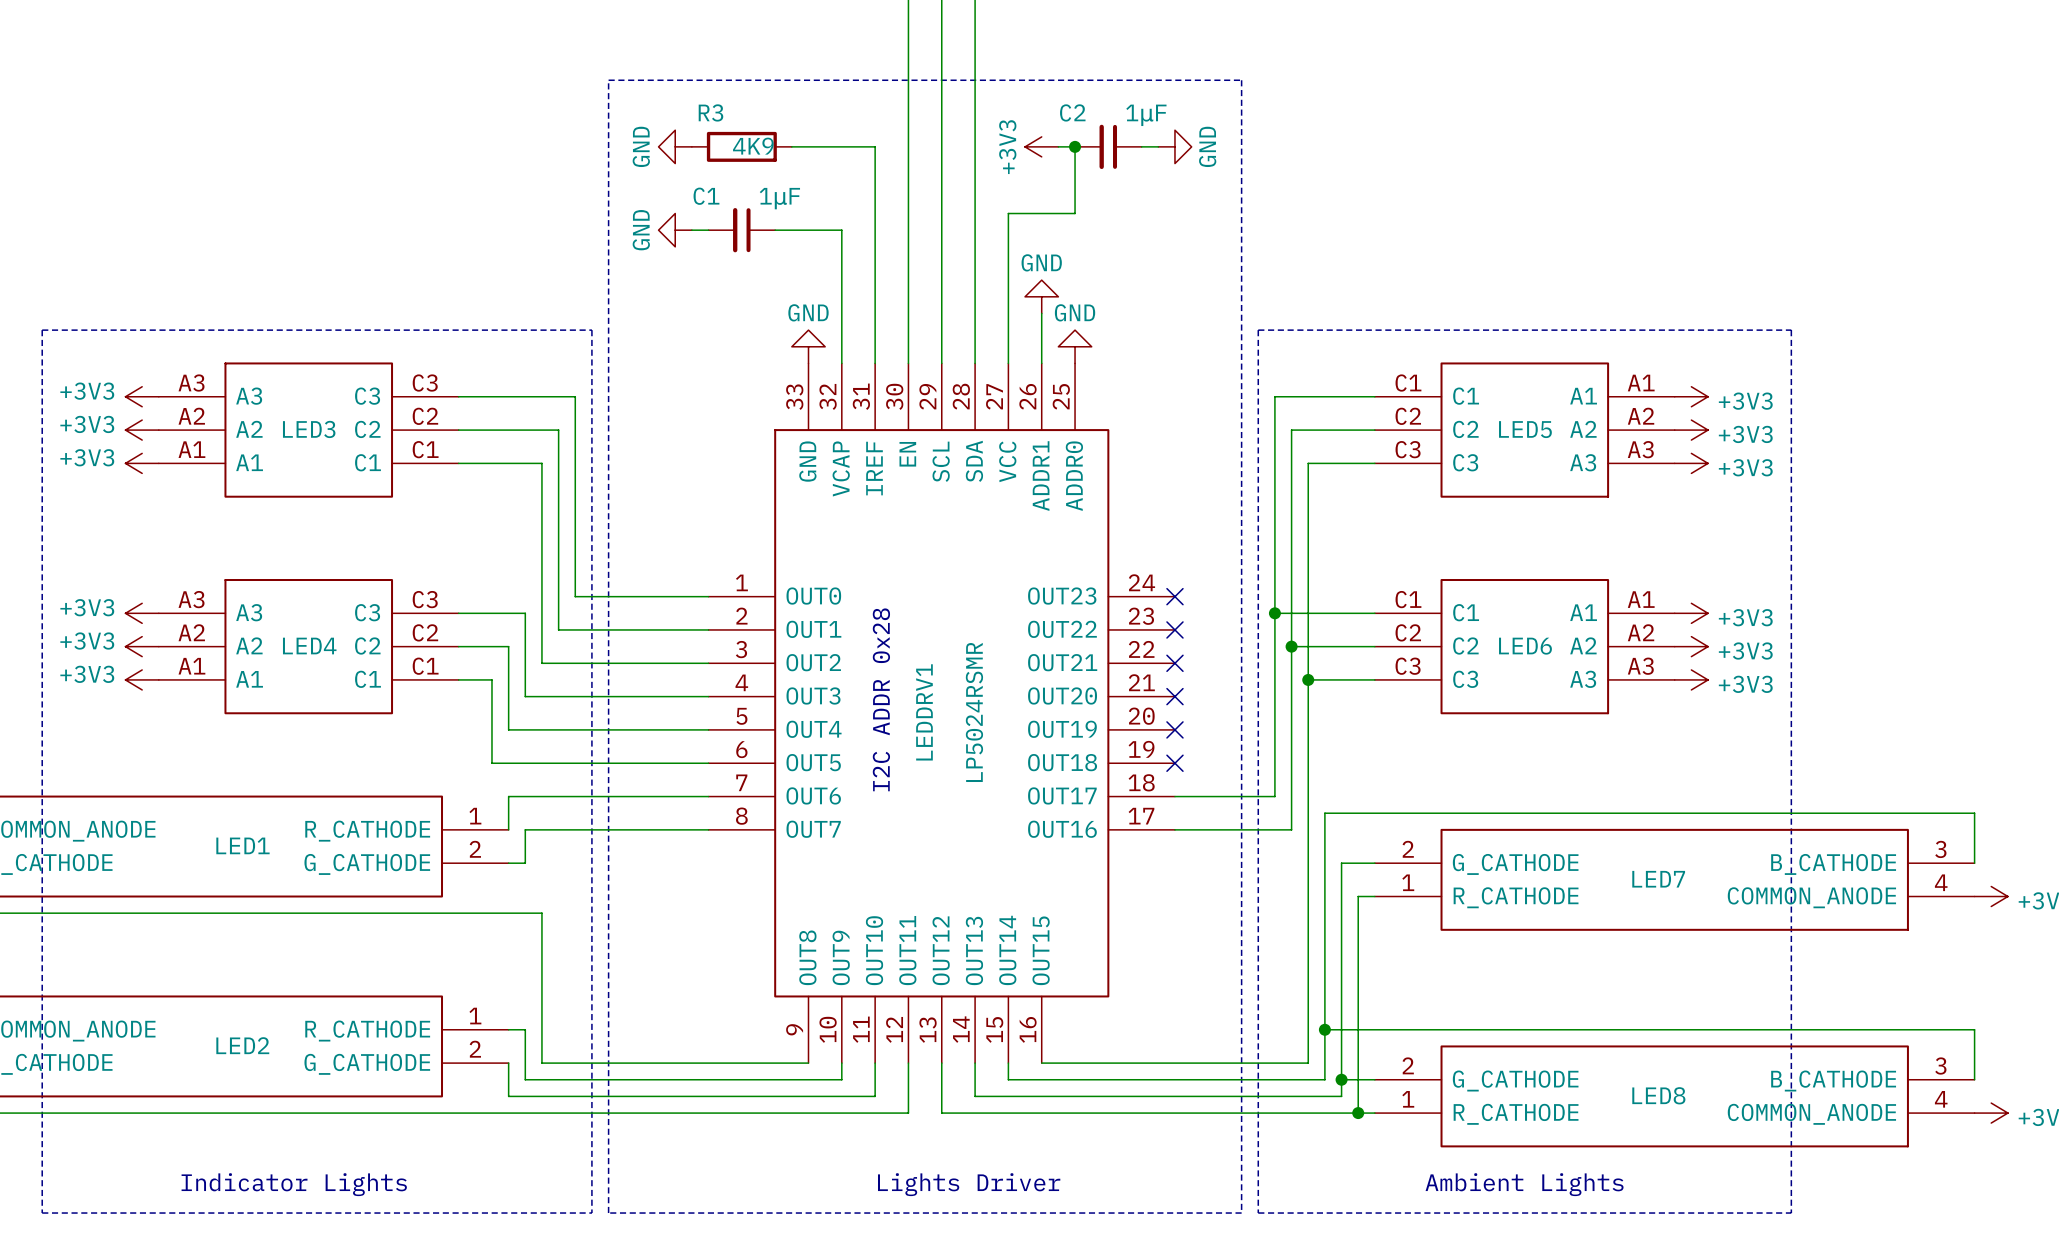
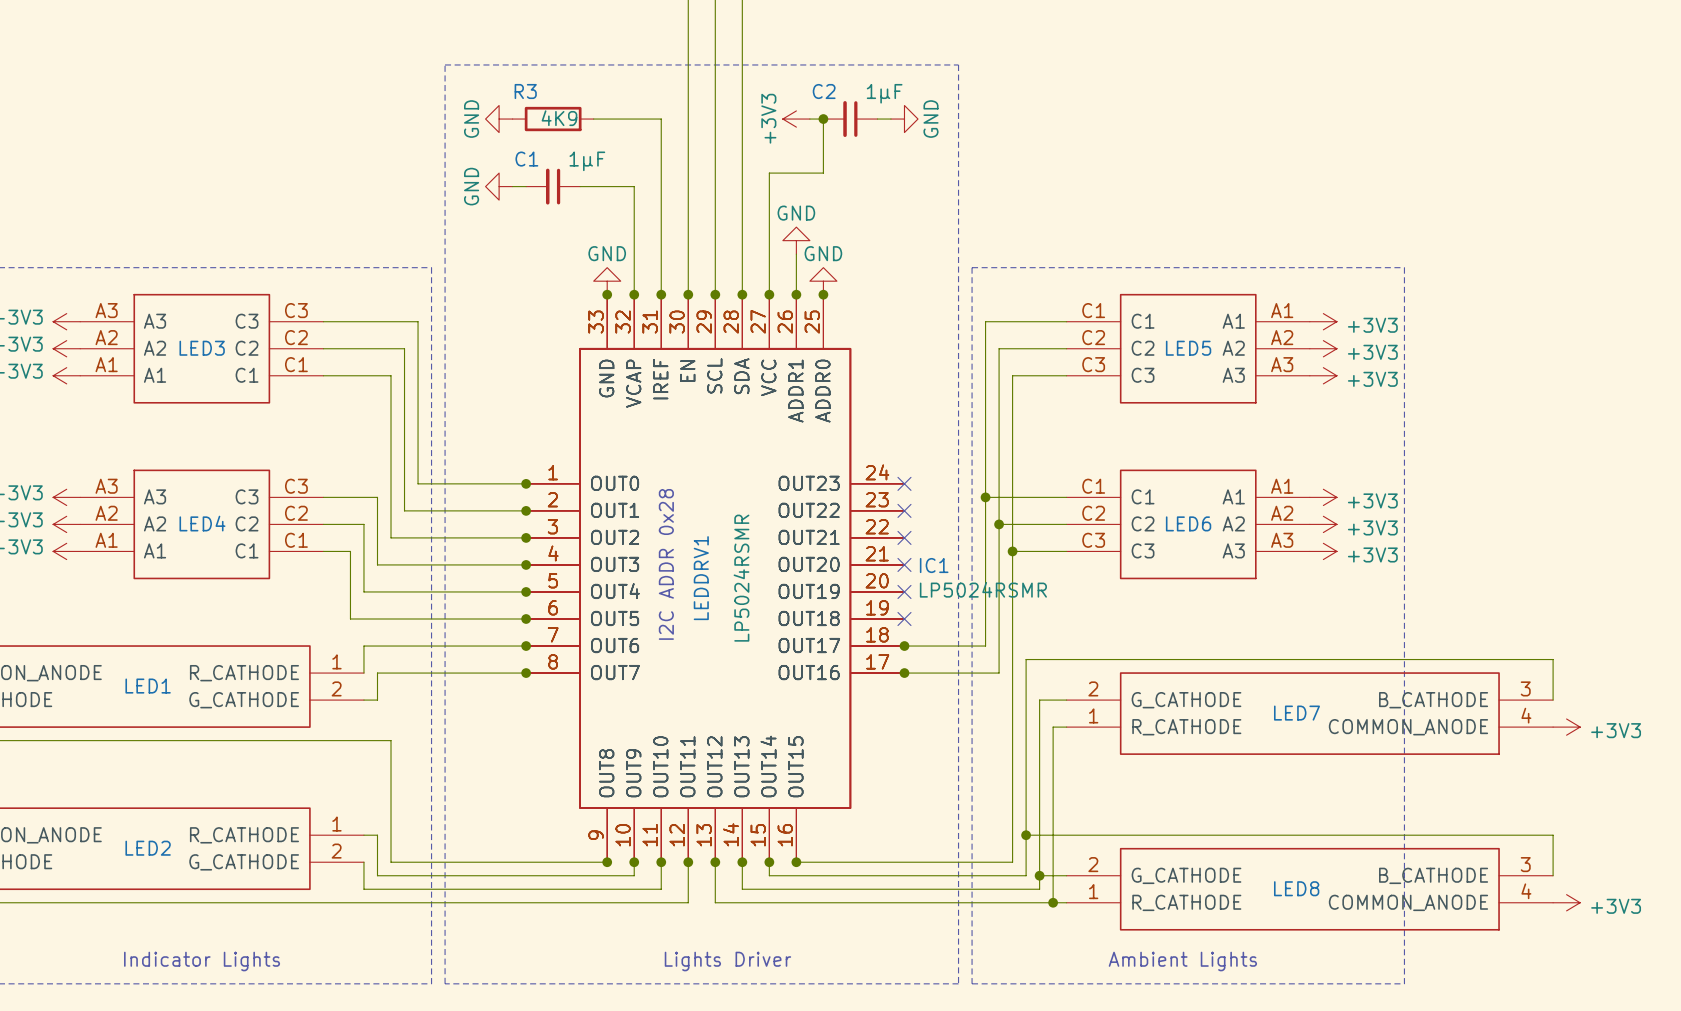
junction: none -> (607, 294)
junction: none -> (634, 294)
junction: none -> (661, 294)
junction: none -> (688, 294)
junction: none -> (715, 294)
junction: none -> (742, 294)
junction: none -> (769, 294)
junction: none -> (796, 294)
junction: none -> (823, 294)
junction: none -> (526, 483)
junction: none -> (526, 510)
junction: none -> (526, 537)
junction: none -> (526, 564)
IC1: none -> LP5024RSMR (715, 578)
junction: none -> (526, 591)
junction: none -> (526, 618)
junction: none -> (526, 646)
junction: none -> (904, 646)
junction: none -> (526, 673)
junction: none -> (904, 673)
junction: none -> (607, 862)
junction: none -> (634, 862)
junction: none -> (661, 862)
junction: none -> (688, 862)
junction: none -> (715, 862)
junction: none -> (742, 862)
junction: none -> (769, 862)
junction: none -> (796, 862)

